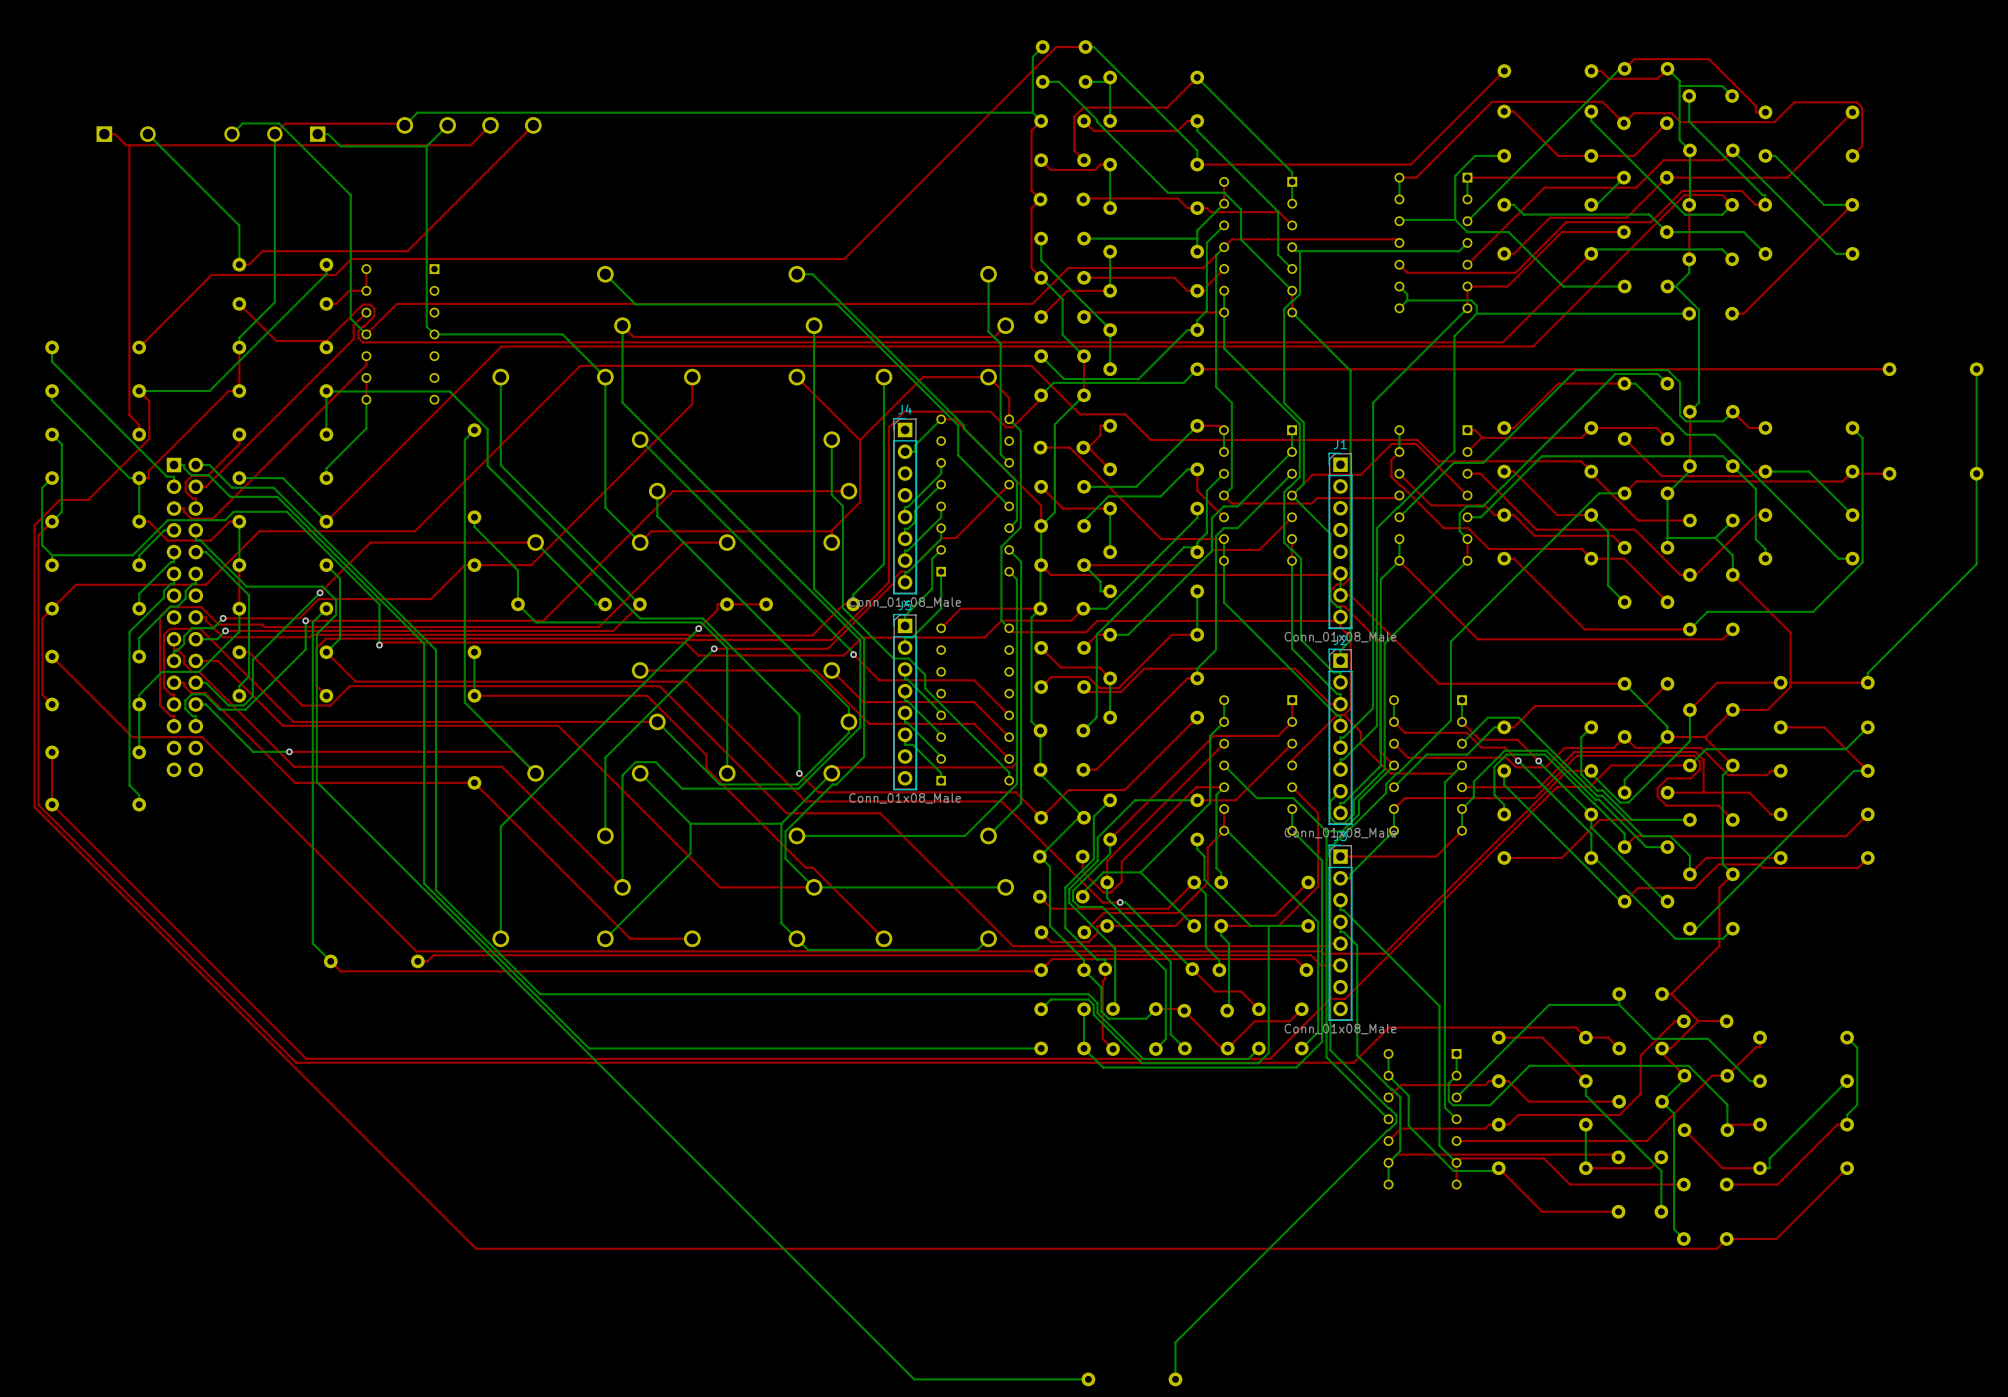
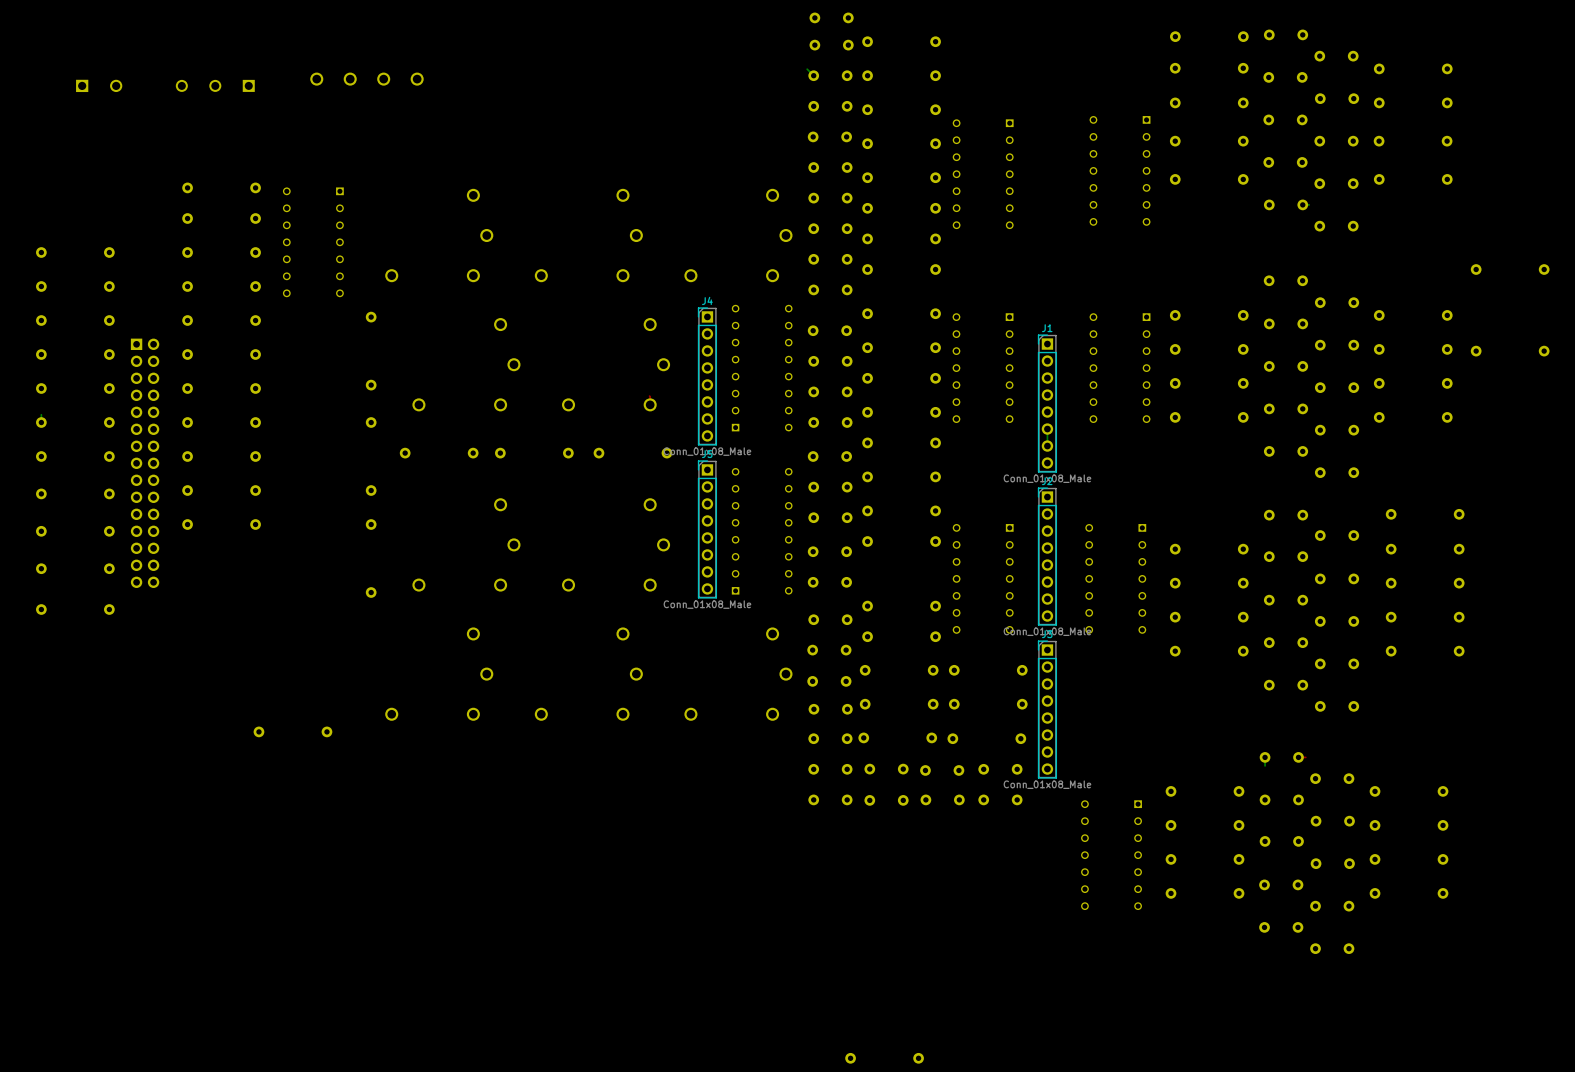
bottom track: (1042, 47) (1032, 56) (1032, 112) (417, 112) (404, 125) -> none
bottom track: (1085, 47) (1093, 47) (1197, 150) (1197, 164) -> none
top track: (1085, 47) (1056, 47) (844, 258) (351, 258) (335, 274) (211, 274) (139, 347) -> none
bottom track: (1624, 68) (1619, 68) (1467, 221) -> none
top track: (1624, 68) (1634, 59) (1708, 59) (1755, 106) (1755, 112) (1765, 112) -> none
bottom track: (1667, 68) (1679, 80) (1679, 140) (1689, 150) (1689, 204) -> none
top track: (1667, 68) (1657, 78) (1608, 78) (1601, 71) (1591, 71) -> none
top track: (1504, 71) (1410, 164) (1197, 164) -> none
bottom track: (1110, 77) (1110, 121) -> none
bottom track: (1197, 77) (1292, 172) (1292, 203) -> none
top track: (1197, 77) (1167, 107) (1083, 107) (1074, 116) (1074, 150) (1084, 160) -> none
bottom track: (1042, 81) (1059, 81) (1167, 192) (1224, 192) (1240, 209) (1240, 239) (1292, 290) -> none
bottom track: (1110, 81) (1085, 81) -> none
bottom track: (1679, 86) (1722, 86) (1732, 96) -> none
bottom track: (1689, 96) (1689, 121) (1762, 195) (1765, 195) (1765, 204) -> none
top track: (1504, 111) (1513, 111) (1558, 155) (1634, 155) (1666, 123) -> none
bottom track: (1591, 111) (1591, 121) (1684, 214) (1722, 214) (1732, 204) -> none
top track: (1852, 112) (1787, 177) (1666, 177) (1626, 217) (1549, 217) (1513, 253) (1504, 253) -> none
top track: (1041, 121) (1031, 130) (1031, 190) (1040, 199) (1031, 208) (1031, 268) (1041, 277) -> none
bottom track: (1197, 121) (1197, 130) (1278, 211) (1278, 254) (1292, 268) -> none
top track: (1197, 121) (1187, 121) (1177, 130) (1093, 130) (1084, 121) -> none
top track: (404, 125) (403, 123) (285, 123) (274, 134) -> none
bottom track: (447, 125) (426, 146) -> none
top track: (490, 125) (470, 145) (126, 145) (114, 134) (104, 134) -> none
top track: (533, 125) (407, 251) (262, 251) (248, 264) (239, 264) -> none
bottom track: (147, 134) (239, 225) (239, 264) -> none
bottom track: (232, 134) (242, 123) (279, 123) (350, 195) (350, 318) (366, 334) -> none
bottom track: (274, 134) (274, 302) (239, 337) (239, 347) -> none
bottom track: (317, 134) (328, 134) (340, 146) (426, 146) -> none
top track: (129, 145) (129, 415) (139, 424) (139, 434) -> none
bottom track: (426, 146) (426, 326) (434, 334) (562, 334) (605, 377) (605, 507) (640, 542) -> none
bottom track: (1732, 150) (1836, 253) (1852, 253) -> none
top track: (1732, 150) (1723, 160) (1663, 160) (1636, 187) (1544, 187) (1467, 264) -> none
bottom track: (1504, 155) (1475, 155) (1455, 175) (1455, 219) -> none
bottom track: (1765, 155) (1775, 155) (1824, 204) (1852, 204) -> none
top track: (1852, 155) (1862, 146) (1862, 107) (1856, 102) (1794, 102) (1774, 122) (1680, 122) (1671, 113) (1633, 113) (1623, 123) (1602, 101) (1492, 101) (1416, 177) (1399, 177) -> none
top track: (1041, 160) (1050, 169) (1095, 169) (1100, 164) (1110, 164) -> none
bottom track: (1110, 164) (1110, 208) -> none
bottom track: (1399, 177) (1399, 199) -> none
bottom track: (1467, 177) (1467, 199) -> none
bottom track: (1623, 177) (1596, 204) (1591, 204) -> none
top track: (1623, 177) (1467, 177) -> none
top track: (1224, 181) (1224, 203) -> none
top track: (1083, 199) (1177, 198) (1187, 208) (1206, 208) (1210, 212) (1278, 212) (1292, 225) -> none
bottom track: (1224, 203) (1197, 230) (1197, 251) -> none
bottom track: (1504, 204) (1513, 204) (1523, 214) (1649, 214) (1666, 232) (1743, 232) (1765, 253) -> none
top track: (1689, 204) (1689, 259) -> none
top track: (1732, 204) (1722, 195) (1684, 195) (1533, 346) (501, 346) (326, 521) -> none
top track: (1765, 204) (1755, 204) (1741, 190) (1682, 190) (1651, 222) (1566, 222) (1515, 272) (1407, 272) (1399, 264) -> none
top track: (1852, 204) (1743, 313) (1732, 313) -> none
bottom track: (1455, 219) (1467, 232) (1508, 232) (1563, 286) (1624, 286) -> none
bottom track: (1455, 219) (1399, 221) -> none
bottom track: (1224, 225) (1206, 242) (1206, 310) (1197, 320) (1197, 330) (1187, 330) (1138, 379) (1064, 379) (1041, 356) -> none
top track: (1623, 232) (1561, 232) (1507, 286) (1467, 286) (1467, 308) -> none
bottom track: (1041, 238) (1041, 260) (1110, 329) (1110, 369) -> none
bottom track: (1197, 238) (1084, 238) -> none
top track: (1399, 242) (1395, 239) (1232, 239) (1203, 267) (1068, 267) (1032, 303) (396, 303) (366, 334) -> none
bottom track: (1467, 242) (1459, 251) (1296, 251) (1292, 247) -> none
bottom track: (1224, 247) (1216, 255) (1216, 387) (1231, 402) (1231, 487) (1223, 495) -> none
bottom track: (1110, 251) (1110, 290) -> none
bottom track: (1300, 251) (1300, 294) (1284, 309) (1284, 402) (1303, 422) (1303, 483) (1292, 495) (1330, 533) (1330, 600) (1337, 607) (1340, 607) (1340, 617) -> none
bottom track: (1591, 253) (1595, 249) (1722, 249) (1732, 259) -> none
top track: (1591, 253) (1502, 342) (362, 342) (358, 338) (358, 330) (374, 316) (374, 308) (370, 304) (362, 304) (326, 341) -> none
bottom track: (1689, 259) (1689, 272) (1675, 286) (1699, 309) (1699, 402) (1689, 411) -> none
bottom track: (326, 264) (326, 274) (209, 391) (139, 391) -> none
top track: (1224, 268) (1206, 286) (1206, 290) (1187, 290) (1174, 277) (1084, 277) -> none
top track: (366, 269) (366, 290) (349, 290) (336, 303) (326, 303) -> none
bottom track: (605, 274) (635, 304) (837, 304) (958, 425) (958, 455) (1009, 506) -> none
bottom track: (796, 274) (812, 274) (964, 425) (964, 428) (1016, 481) (1016, 520) (1009, 528) -> none
bottom track: (988, 274) (988, 331) (1000, 343) (1000, 454) (1009, 462) -> none
bottom track: (1041, 277) (1062, 299) (1062, 334) (1084, 356) -> none
bottom track: (1399, 286) (1407, 294) (1407, 300) -> none
top track: (1110, 290) (1067, 290) (1041, 316) -> none
bottom track: (1224, 290) (1224, 348) (1299, 424) (1299, 477) (1284, 492) (1284, 542) (1301, 558) (1301, 639) (1333, 672) (1340, 672) (1340, 682) -> none
top track: (1292, 290) (1292, 312) -> none
bottom track: (1407, 300) (1471, 300) (1476, 305) (1476, 313) -> none
bottom track: (1407, 300) (1399, 308) -> none
top track: (239, 303) (276, 341) (326, 341) -> none
bottom track: (1467, 308) (1373, 402) (1373, 708) (1343, 737) (1340, 737) (1340, 747) -> none
top track: (366, 312) (353, 325) (353, 338) (205, 486) (195, 486) -> none
top track: (1224, 312) (1088, 312) (1084, 316) -> none
bottom track: (1292, 312) (1350, 370) (1350, 640) (1340, 650) (1340, 660) -> none
bottom track: (1476, 313) (1454, 336) (1454, 451) (1376, 528) (1376, 726) (1343, 759) (1340, 759) (1340, 769) -> none
bottom track: (1689, 313) (1476, 313) -> none
bottom track: (622, 325) (622, 402) (860, 640) (860, 727) (798, 788) (682, 788) (655, 762) (635, 762) (622, 775) (622, 887) -> none
bottom track: (814, 325) (814, 588) (864, 638) (864, 756) (836, 784) (832, 784) (785, 831) (785, 858) (814, 887) (1005, 887) -> none
top track: (1005, 325) (994, 336) (633, 336) (622, 325) -> none
bottom track: (52, 347) (52, 361) (167, 476) (174, 476) (174, 486) -> none
top track: (239, 347) (239, 391) (228, 391) (148, 470) (148, 478) (139, 478) -> none
top track: (366, 356) (366, 365) (212, 518) (191, 518) (184, 511) (184, 508) (174, 508) -> none
top track: (1084, 356) (1084, 395) -> none
bottom track: (1197, 369) (1183, 382) (1053, 382) (1041, 395) -> none
top track: (1889, 369) (1197, 369) -> none
bottom track: (1976, 369) (1976, 564) (1867, 673) (1867, 682) -> none
top track: (366, 377) (366, 399) -> none
bottom track: (500, 377) (500, 465) (639, 604) -> none
top track: (692, 377) (692, 403) (531, 565) (464, 565) (430, 599) (318, 599) (299, 618) (223, 618) -> none
top track: (796, 377) (860, 440) -> none
bottom track: (883, 377) (883, 564) (853, 594) (853, 604) -> none
bottom track: (1624, 383) (1635, 383) (1686, 434) (1715, 434) (1838, 558) (1852, 558) -> none
top track: (1624, 383) (1558, 383) (1513, 428) (1504, 428) -> none
bottom track: (1667, 383) (1657, 373) (1615, 373) (1483, 506) (1466, 506) (1459, 513) (1459, 531) (1467, 539) -> none
bottom track: (52, 391) (52, 400) (129, 478) (139, 478) (139, 521) -> none
top track: (139, 391) (149, 401) (149, 438) (88, 499) (59, 499) (34, 525) (34, 807) (476, 1248) (1716, 1248) (1726, 1238) (1776, 1238) (1847, 1168) -> none
bottom track: (326, 391) (326, 434) -> none
bottom track: (326, 391) (449, 391) (487, 429) (487, 466) (640, 618) (702, 618) (799, 715) (799, 773) -> none
top track: (1041, 395) (1041, 398) (1012, 427) (1006, 427) (990, 411) (904, 411) (888, 427) (888, 582) (831, 640) (325, 638) (316, 648) (316, 685) (326, 695) -> none
bottom track: (1084, 395) (1054, 424) (1054, 512) (1041, 525) (1040, 608) (1031, 617) (1031, 721) (1040, 730) (1040, 774) (1084, 817) -> none
bottom track: (366, 399) (366, 428) (326, 468) (326, 478) -> none
top track: (1689, 411) (1689, 466) -> none
bottom track: (1732, 411) (1723, 421) (1685, 421) (1680, 415) (1680, 382) (1667, 370) (1576, 370) (1483, 462) (1453, 462) (1399, 517) -> none
top track: (1732, 411) (1749, 428) (1765, 428) -> none
bottom track: (941, 419) (915, 445) (915, 451) (905, 451) -> none
top track: (941, 419) (954, 419) (1041, 505) (1041, 525) -> none
bottom track: (1009, 419) (1020, 430) (1020, 527) (1001, 546) (1001, 620) (1009, 628) -> none
top track: (1009, 419) (1009, 397) (988, 377) (923, 377) (860, 440) -> none
top track: (1110, 425) (1100, 425) (1100, 435) (1088, 447) -> none
bottom track: (1197, 425) (1136, 486) (1084, 486) -> none
top track: (1197, 425) (1219, 425) (1223, 430) -> none
bottom track: (1852, 428) (1862, 438) (1862, 562) (1813, 611) (1707, 611) (1689, 629) -> none
bottom track: (474, 430) (464, 439) (464, 702) (535, 773) -> none
bottom track: (1223, 430) (1223, 451) -> none
bottom track: (1292, 430) (1292, 451) (1237, 506) (1223, 506) (1211, 518) (1211, 551) (1128, 634) (1110, 634) -> none
bottom track: (1399, 430) (1399, 451) -> none
top track: (1467, 430) (1475, 430) (1482, 437) (1581, 437) (1591, 428) (1656, 428) (1667, 438) -> none
bottom track: (52, 434) (61, 444) (61, 511) (52, 521) -> none
top track: (239, 434) (239, 444) (207, 475) (192, 475) (185, 482) (185, 491) (192, 498) (195, 498) (195, 508) -> none
top track: (1482, 437) (1467, 451) -> none
top track: (1624, 438) (1661, 476) (1751, 476) (1755, 471) (1765, 471) -> none
bottom track: (640, 439) (853, 654) -> none
bottom track: (831, 439) (831, 494) (842, 506) (842, 607) (893, 658) (908, 658) (925, 674) (925, 688) (1009, 772) (1009, 780) -> none
top track: (860, 440) (860, 502) (830, 531) (651, 531) (640, 542) -> none
top track: (1040, 447) (1069, 447) (1161, 539) (1223, 539) -> none
top track: (1088, 447) (1110, 469) -> none
top track: (1399, 451) (1391, 460) (1391, 476) (1443, 528) (1468, 528) (1489, 548) (1581, 548) (1591, 558) (1623, 558) (1667, 602) -> none
bottom track: (941, 462) (941, 473) (907, 506) (905, 506) (905, 517) -> none
bottom track: (174, 465) (184, 465) (184, 468) (191, 475) (208, 475) (230, 496) (277, 496) (424, 643) (424, 883) (589, 1048) (1041, 1048) -> none
bottom track: (195, 465) (209, 465) (232, 487) (273, 487) (435, 650) (435, 889) (540, 994) (1088, 994) (1097, 1003) (1097, 1013) (1143, 1059) (1248, 1059) (1258, 1048) -> none
bottom track: (1689, 466) (1689, 470) (1667, 493) (1667, 547) -> none
bottom track: (1197, 469) (1187, 469) (1160, 496) (1108, 496) (1084, 520) (1084, 525) -> none
top track: (1197, 469) (1197, 490) (1223, 517) -> none
top track: (1504, 471) (1513, 471) (1557, 515) (1591, 515) -> none
bottom track: (1765, 471) (1809, 471) (1852, 515) -> none
bottom track: (1223, 473) (1206, 490) (1206, 532) (1197, 542) (1197, 552) -> none
bottom track: (1292, 473) (1237, 528) (1223, 528) (1215, 536) (1215, 649) (1197, 668) (1197, 678) -> none
top track: (1399, 473) (1431, 505) (1484, 505) (1494, 515) (1513, 515) (1534, 535) (1612, 535) (1624, 547) -> none
top track: (1467, 473) (1480, 473) (1536, 529) (1635, 529) (1680, 574) (1695, 574) (1755, 515) (1765, 515) -> none
top track: (1889, 473) (1854, 473) (1852, 471) (1842, 481) (1636, 481) (1624, 493) -> none
bottom track: (52, 478) (42, 488) (42, 545) (52, 555) (132, 555) (167, 520) (225, 520) (233, 511) (286, 511) (379, 604) (379, 645) -> none
bottom track: (239, 478) (282, 478) (326, 521) -> none
bottom track: (941, 484) (915, 510) (915, 521) (908, 528) (905, 528) (905, 538) -> none
top track: (1009, 484) (955, 538) (941, 538) (908, 571) (901, 571) (894, 578) (894, 582) (828, 648) (714, 648) -> none
top track: (1041, 486) (1062, 508) (1110, 508) -> none
bottom track: (657, 491) (657, 516) (848, 707) (848, 732) (797, 784) (719, 784) (657, 721) -> none
top track: (848, 491) (673, 491) (543, 620) (305, 620) -> none
bottom track: (1624, 493) (1599, 493) (1450, 641) (1450, 720) (1386, 784) (1386, 792) (1330, 847) (1330, 1050) (1396, 1115) (1396, 1122) (1175, 1342) (1175, 1379) -> none
top track: (1399, 495) (1396, 498) (1317, 498) (1311, 503) (1232, 503) (1223, 495) -> none
top track: (1467, 495) (1415, 443) (1391, 443) (1360, 474) (1312, 474) (1292, 495) -> none
top track: (1350, 498) (1350, 577) (1343, 584) (1337, 584) (1330, 591) (1330, 599) (1337, 606) (1344, 606) (1379, 641) (1379, 751) (1393, 765) -> none
bottom track: (941, 506) (941, 517) (908, 550) (905, 550) (905, 560) -> none
bottom track: (1110, 508) (1110, 552) -> none
bottom track: (1197, 508) (1197, 517) (1106, 608) (1083, 608) -> none
bottom track: (1591, 515) (1608, 531) (1608, 585) (1624, 602) -> none
bottom track: (474, 517) (474, 526) (518, 570) (518, 604) (536, 622) (701, 622) (727, 648) (727, 773) -> none
top track: (1292, 517) (1259, 549) (1213, 549) (1197, 565) (1084, 565) -> none
bottom track: (1467, 517) (1480, 517) (1541, 456) (1722, 456) (1755, 489) (1755, 539) (1765, 548) (1765, 558) -> none
top track: (1689, 520) (1638, 520) (1581, 461) (1438, 461) (1417, 440) (1150, 440) (1125, 414) (1079, 414) (1031, 365) (580, 365) (414, 531) (259, 531) (205, 584) (76, 584) (42, 618) (42, 694) (52, 704) -> none
bottom track: (1732, 520) (1715, 538) -> none
top track: (52, 521) (38, 535) (38, 805) (296, 1062) (1353, 1062) (1389, 1027) (1575, 1027) (1585, 1037) (1608, 1037) (1619, 1048) -> none
bottom track: (239, 521) (239, 565) -> none
top track: (239, 521) (229, 521) (210, 540) (167, 540) (148, 521) (139, 521) -> none
bottom track: (941, 528) (941, 538) (907, 572) (905, 572) (905, 582) -> none
bottom track: (174, 530) (163, 530) (139, 555) (139, 565) -> none
bottom track: (195, 530) (195, 540) (200, 540) (246, 586) (322, 586) (336, 600) (336, 614) (316, 634) (316, 781) (914, 1379) (1088, 1379) -> none
bottom track: (1715, 538) (1667, 538) -> none
bottom track: (1715, 538) (1732, 555) (1732, 574) -> none
bottom track: (1223, 539) (1223, 602) (1337, 715) (1340, 715) (1340, 725) -> none
top track: (1292, 539) (1292, 560) -> none
bottom track: (1399, 539) (1399, 560) (1380, 579) (1380, 765) (1343, 802) (1340, 802) (1340, 813) -> none
top track: (1467, 539) (1467, 560) -> none
bottom track: (535, 542) (595, 604) (605, 604) -> none
top track: (535, 542) (370, 542) (320, 592) -> none
top track: (727, 542) (683, 542) (598, 627) (264, 627) (262, 624) (218, 624) (201, 607) (169, 607) (160, 616) (160, 705) (170, 716) (174, 716) (174, 726) -> none
bottom track: (1197, 547) (1184, 547) (1096, 634) (1096, 717) (1083, 730) -> none
bottom track: (941, 549) (932, 558) (932, 588) (905, 615) (905, 625) -> none
bottom track: (1009, 549) (1021, 561) (1021, 803) (988, 835) -> none
bottom track: (174, 552) (174, 562) (170, 562) (139, 593) (139, 608) -> none
bottom track: (195, 552) (205, 552) (248, 595) (248, 676) (239, 686) (239, 695) -> none
top track: (1504, 558) (1513, 558) (1584, 629) (1689, 629) -> none
bottom track: (1292, 560) (1292, 648) (1337, 694) (1340, 694) (1340, 704) -> none
top track: (1399, 560) (1477, 639) (1722, 639) (1732, 629) -> none
bottom track: (1467, 560) (1384, 643) (1384, 769) (1353, 800) (1353, 814) (1344, 823) (1335, 823) (1330, 817) (1330, 801) (1340, 791) -> none
top track: (239, 565) (239, 608) -> none
bottom track: (326, 565) (340, 578) (340, 638) (326, 652) -> none
top track: (1041, 565) (1050, 574) (1340, 573) -> none
bottom track: (1084, 565) (1100, 581) (1100, 591) (1110, 591) -> none
bottom track: (941, 571) (941, 608) (912, 637) (905, 637) (905, 647) -> none
bottom track: (1009, 571) (1016, 579) (1016, 783) (964, 835) (796, 835) -> none
bottom track: (174, 573) (174, 583) (170, 583) (163, 590) (163, 597) (129, 632) (129, 785) (139, 795) (139, 804) -> none
bottom track: (195, 573) (195, 583) (192, 583) (185, 590) (185, 598) (177, 606) (170, 606) (139, 637) (139, 656) -> none
top track: (1732, 574) (1790, 632) (1790, 686) (1767, 709) (1732, 709) (1705, 736) -> none
bottom track: (1197, 591) (1197, 634) -> none
bottom track: (320, 592) (252, 660) (252, 696) (243, 705) (228, 705) (205, 682) (195, 682) -> none
via: (320, 592) -> none
top track: (1340, 595) (1350, 595) (1439, 683) (1624, 683) -> none
top track: (639, 604) (613, 630) (225, 630) -> none
top track: (766, 604) (717, 604) (717, 610) (698, 628) -> none
top track: (853, 604) (843, 604) (812, 635) (312, 634) (309, 637) (222, 637) (205, 620) (205, 617) (195, 617) -> none
bottom track: (239, 608) (239, 631) (199, 671) (162, 671) (139, 694) (139, 752) -> none
bottom track: (326, 608) (312, 622) (312, 943) (330, 961) -> none
top track: (1040, 608) (960, 608) (941, 628) -> none
top track: (1083, 608) (1071, 620) (1001, 620) (984, 637) (861, 637) (843, 655) (698, 655) (685, 642) (382, 642) (379, 645) -> none
top track: (1340, 617) (1340, 627) (1350, 637) (1350, 708) (1343, 715) -> none
bottom track: (223, 618) (213, 628) (192, 628) (184, 636) (184, 643) (177, 650) (174, 650) (174, 660) -> none
via: (223, 618) -> none
bottom track: (305, 620) (305, 649) (245, 709) (219, 709) (204, 694) (191, 694) (185, 700) (185, 708) (192, 716) (195, 716) (195, 726) -> none
via: (305, 620) -> none
top track: (1340, 620) (1097, 620) (1085, 632) (1013, 632) (1009, 628) -> none
bottom track: (698, 628) (500, 826) (500, 938) -> none
via: (698, 628) -> none
bottom track: (225, 630) (217, 639) (195, 639) -> none
via: (225, 630) -> none
top track: (1017, 632) (1017, 762) (1012, 767) (837, 767) (831, 773) -> none
top track: (1110, 634) (1097, 634) (1084, 647) -> none
top track: (1197, 634) (1171, 634) (1118, 688) (1099, 688) (1088, 677) (1051, 677) (1041, 687) -> none
top track: (174, 639) (174, 649) (177, 649) (184, 656) (184, 663) (192, 671) (199, 671) (294, 766) (501, 766) (622, 887) -> none
via: (379, 645) -> none
top track: (1041, 647) (1060, 667) (1099, 667) (1110, 678) -> none
bottom track: (714, 648) (605, 757) (605, 835) -> none
via: (714, 648) -> none
top track: (239, 652) (248, 652) (302, 705) (330, 705) (349, 686) (659, 686) (786, 813) (880, 813) (1012, 946) (1327, 946) (1330, 943) (1340, 943) -> none
top track: (326, 652) (355, 681) (685, 681) (805, 801) (1001, 801) (1102, 902) (1120, 902) -> none
bottom track: (474, 652) (474, 695) -> none
top track: (853, 654) (879, 680) (974, 680) (1009, 715) -> none
via: (853, 654) -> none
top track: (52, 656) (132, 737) (202, 737) (416, 951) (1321, 951) (1323, 953) (1384, 953) (1567, 770) (1591, 770) -> none
top track: (195, 660) (218, 660) (282, 725) (558, 725) (719, 887) (814, 887) -> none
bottom track: (905, 669) (905, 679) (907, 679) (941, 712) (941, 715) -> none
top track: (640, 670) (815, 670) (869, 723) (974, 723) (1009, 758) -> none
top track: (831, 670) (863, 702) (974, 702) (1009, 737) -> none
bottom track: (1110, 678) (1110, 717) -> none
top track: (1197, 678) (1187, 678) (1096, 769) (1083, 769) -> none
top track: (174, 682) (184, 682) (184, 685) (191, 692) (205, 692) (295, 782) (474, 782) (630, 938) (692, 938) -> none
top track: (1780, 682) (1717, 682) (1689, 709) -> none
top track: (1867, 682) (1790, 682) -> none
bottom track: (1624, 683) (1667, 726) (1667, 736) (1624, 779) (1624, 792) -> none
top track: (1667, 683) (1645, 706) (1535, 706) (1513, 727) (1504, 727) -> none
top track: (1084, 687) (1088, 692) (1120, 692) (1144, 668) (1294, 668) (1330, 704) (1340, 704) -> none
bottom track: (905, 691) (905, 701) (907, 701) (941, 734) (941, 737) -> none
top track: (474, 695) (647, 695) (706, 754) (706, 768) (805, 867) (812, 867) (883, 938) -> none
bottom track: (1224, 700) (1224, 721) (1210, 735) (1210, 802) (1140, 872) -> none
top track: (1292, 700) (1292, 721) (1278, 735) (1213, 735) (1110, 839) -> none
bottom track: (1393, 700) (1393, 721) -> none
bottom track: (1462, 700) (1462, 721) -> none
top track: (174, 704) (174, 694) (170, 694) (163, 687) (163, 634) (170, 628) (200, 628) (293, 721) (657, 721) -> none
bottom track: (195, 704) (205, 704) (253, 751) (289, 751) -> none
bottom track: (1689, 709) (1689, 741) (1628, 802) (1620, 802) (1591, 773) (1591, 770) -> none
bottom track: (905, 712) (905, 723) (907, 723) (941, 756) (941, 758) -> none
top track: (1343, 715) (1337, 715) (1292, 759) (1292, 765) -> none
top track: (1343, 715) (1360, 732) (1360, 744) (1390, 773) (1453, 773) (1462, 765) -> none
top track: (1197, 717) (1124, 790) (1068, 790) (1041, 817) (1015, 792) (818, 792) (799, 773) -> none
top track: (1393, 721) (1404, 732) (1466, 732) (1481, 747) (1505, 747) (1518, 760) -> none
top track: (1462, 721) (1479, 739) (1517, 739) (1538, 761) -> none
bottom track: (1504, 727) (1494, 727) (1467, 754) (1426, 754) (1393, 787) -> none
bottom track: (1591, 727) (1581, 737) (1581, 774) (1597, 790) (1602, 790) (1632, 819) (1689, 819) -> none
top track: (1780, 727) (1824, 727) (1867, 770) -> none
bottom track: (1867, 727) (1846, 749) (1706, 749) (1689, 765) -> none
bottom track: (905, 734) (905, 744) (912, 744) (941, 773) (941, 780) -> none
top track: (1705, 736) (1667, 736) -> none
top track: (1705, 736) (1732, 765) -> none
top track: (1224, 743) (1107, 860) (1107, 882) -> none
top track: (1292, 743) (1235, 800) (1197, 800) -> none
top track: (1393, 743) (1408, 757) (1506, 757) (1516, 767) (1545, 767) (1564, 748) (1613, 748) (1624, 736) (1635, 747) (1701, 747) (1728, 775) (1766, 775) (1771, 770) (1780, 770) -> none
bottom track: (1462, 743) (1488, 717) (1518, 717) (1596, 795) (1602, 795) (1642, 836) (1670, 836) (1689, 855) (1689, 874) -> none
top track: (289, 751) (514, 751) (535, 773) -> none
via: (289, 751) -> none
top track: (52, 752) (52, 804) (306, 1058) (1270, 1058) (1330, 998) (1345, 998) (1557, 786) (1589, 786) (1611, 765) (1689, 765) -> none
bottom track: (1518, 760) (1591, 833) (1591, 857) (1594, 857) (1675, 938) (1722, 938) (1732, 928) -> none
via: (1518, 760) -> none
bottom track: (1538, 761) (1591, 814) (1591, 827) (1667, 901) -> none
via: (1538, 761) -> none
bottom track: (1224, 765) (1256, 798) (1293, 798) (1326, 831) -> none
bottom track: (1393, 765) (1358, 800) (1358, 814) (1341, 831) (1326, 831) -> none
bottom track: (1462, 765) (1444, 782) (1444, 1107) (1456, 1119) -> none
bottom track: (1732, 765) (1722, 775) (1722, 864) (1732, 874) -> none
bottom track: (1504, 770) (1504, 784) (1620, 901) (1624, 901) -> none
bottom track: (1867, 770) (1854, 770) (1696, 928) (1689, 928) -> none
bottom track: (640, 773) (690, 823) -> none
via: (799, 773) -> none
bottom track: (831, 773) (781, 823) -> none
bottom track: (1224, 787) (1216, 794) (1216, 868) (1221, 872) (1221, 882) -> none
top track: (1224, 787) (1196, 787) (1121, 861) (1121, 881) (1110, 892) (1103, 892) (1082, 871) (1082, 856) -> none
top track: (1292, 787) (1318, 813) (1318, 886) (1278, 925) (1221, 925) -> none
top track: (1462, 787) (1539, 787) (1574, 751) (1695, 751) (1703, 759) (1703, 792) -> none
top track: (1667, 792) (1749, 792) (1771, 814) (1780, 814) -> none
bottom track: (1110, 800) (1093, 816) (1093, 859) (1065, 887) (1065, 927) (1096, 959) (1105, 959) (1105, 969) -> none
bottom track: (1197, 800) (1135, 800) (1097, 837) (1097, 860) (1069, 889) (1069, 902) (1115, 948) (1115, 1006) (1113, 1009) -> none
top track: (1224, 809) (1224, 830) (1207, 847) (1207, 882) (1177, 913) (1103, 913) (1084, 932) -> none
bottom track: (1292, 809) (1292, 830) (1322, 860) (1322, 1041) (1296, 1067) (1103, 1067) (1084, 1048) (1084, 1009) -> none
bottom track: (1393, 809) (1393, 830) (1350, 874) (1350, 878) (1340, 878) -> none
top track: (1393, 809) (1404, 798) (1534, 798) (1576, 755) (1694, 755) (1699, 761) (1699, 769) (1690, 778) (1667, 778) (1657, 788) (1657, 796) (1666, 805) (1718, 805) (1732, 819) -> none
bottom track: (1504, 814) (1504, 804) (1494, 794) (1494, 766) (1506, 754) (1544, 754) (1624, 833) (1624, 847) -> none
top track: (1867, 814) (1846, 836) (1635, 836) (1624, 847) -> none
bottom track: (1081, 815) (1039, 856) (1050, 866) (1050, 926) (1084, 960) (1084, 970) (1101, 987) (1101, 1011) (1108, 1018) (1146, 1018) (1155, 1009) -> none
top track: (1689, 819) (1599, 819) (1561, 857) (1504, 857) -> none
bottom track: (690, 823) (690, 853) (605, 938) -> none
bottom track: (781, 823) (690, 823) -> none
bottom track: (781, 823) (781, 923) (808, 949) (977, 949) (988, 938) -> none
bottom track: (1224, 830) (1227, 830) (1318, 921) (1318, 1032) (1301, 1048) -> none
bottom track: (1462, 830) (1462, 809) (1473, 797) (1473, 781) (1504, 750) (1546, 750) (1646, 847) (1667, 847) -> none
top track: (1462, 830) (1436, 856) (1340, 856) -> none
bottom track: (1326, 831) (1326, 1057) (1388, 1119) -> none
bottom track: (1110, 839) (1110, 853) (1073, 890) (1073, 900) (1079, 906) (1102, 906) (1165, 970) (1165, 1039) (1155, 1049) -> none
bottom track: (1197, 839) (1197, 849) (1204, 856) (1204, 879) (1250, 925) (1308, 925) -> none
top track: (1780, 857) (1706, 857) (1689, 874) -> none
top track: (1867, 857) (1857, 867) (1763, 867) (1759, 864) (1718, 864) (1694, 888) (1638, 888) (1624, 901) -> none
bottom track: (1140, 872) (1103, 872) (1082, 893) (1082, 896) -> none
bottom track: (1140, 872) (1194, 925) -> none
top track: (1732, 874) (1719, 887) (1719, 946) (1671, 994) (1698, 1020) -> none
bottom track: (1107, 882) (1107, 898) (1170, 961) (1170, 1034) (1184, 1048) -> none
bottom track: (1194, 882) (1205, 894) (1205, 946) (1219, 960) (1219, 970) -> none
top track: (1194, 882) (1168, 908) (1051, 908) (1039, 896) -> none
top track: (1308, 882) (1275, 915) (1185, 915) (1175, 925) (1097, 925) (1097, 933) (1088, 942) (1051, 942) (1041, 932) -> none
bottom track: (1340, 900) (1340, 910) (1343, 910) (1439, 1005) (1439, 1145) (1456, 1162) -> none
bottom track: (1120, 902) (1125, 902) (1192, 969) -> none
via: (1120, 902) -> none
bottom track: (1340, 921) (1340, 931) (1343, 931) (1357, 945) (1357, 1055) (1400, 1097) (1400, 1151) (1388, 1162) (1388, 1184) -> none
bottom track: (1221, 925) (1221, 935) (1229, 943) (1229, 1008) (1227, 1010) -> none
bottom track: (1268, 925) (1268, 1052) (1258, 1063) (1142, 1063) (1093, 1014) (1093, 1004) (1088, 999) (1050, 999) (1041, 1009) -> none
top track: (330, 961) (340, 971) (1039, 971) (1052, 959) (1295, 959) (1306, 970) -> none
top track: (417, 961) (427, 961) (433, 955) (1310, 955) (1321, 965) (1340, 965) -> none
top track: (1105, 969) (1105, 978) (1102, 981) (1102, 1038) (1113, 1049) -> none
top track: (1192, 969) (1214, 991) (1241, 991) (1258, 1009) -> none
top track: (1155, 1009) (1182, 1009) (1222, 1048) (1227, 1048) (1254, 1021) (1289, 1021) (1301, 1009) -> none
top track: (1698, 1020) (1670, 1048) (1662, 1048) (1662, 1053) (1684, 1075) -> none
top track: (1698, 1020) (1726, 1021) -> none
top track: (1683, 1021) (1675, 1021) (1640, 1055) (1640, 1093) (1619, 1115) (1518, 1115) (1508, 1124) (1489, 1124) (1485, 1128) (1400, 1128) (1388, 1141) -> none
top track: (1498, 1037) (1542, 1037) (1585, 1081) -> none
top track: (1760, 1037) (1760, 1047) (1755, 1047) (1727, 1075) (1712, 1075) (1646, 1141) (1456, 1141) -> none
bottom track: (1847, 1037) (1857, 1047) (1857, 1104) (1847, 1115) (1847, 1124) -> none
bottom track: (1388, 1053) (1388, 1075) (1408, 1095) (1408, 1125) (1453, 1170) (1496, 1170) (1498, 1168) -> none
bottom track: (1456, 1053) (1456, 1075) (1448, 1083) (1448, 1101) (1452, 1105) (1490, 1105) (1529, 1065) (1688, 1065) (1727, 1104) (1727, 1130) -> none
bottom track: (1684, 1075) (1684, 1079) (1662, 1101) (1674, 1113) (1674, 1229) (1683, 1238) -> none
bottom track: (1585, 1081) (1585, 1095) (1661, 1170) (1661, 1211) -> none
bottom track: (1760, 1081) (1750, 1081) (1708, 1038) (1653, 1038) (1619, 1004) (1549, 1004) (1456, 1097) -> none
bottom track: (1847, 1081) (1769, 1158) (1769, 1168) (1760, 1168) -> none
top track: (1388, 1097) (1400, 1085) (1485, 1085) (1489, 1081) (1508, 1081) (1528, 1101) (1619, 1101) -> none
bottom track: (1585, 1124) (1585, 1168) -> none
top track: (1760, 1124) (1732, 1124) (1727, 1130) -> none
top track: (1847, 1124) (1837, 1124) (1777, 1184) (1726, 1184) -> none
top track: (1684, 1130) (1722, 1168) (1760, 1168) -> none
top track: (1618, 1157) (1615, 1154) (1396, 1154) (1388, 1162) -> none
top track: (1661, 1157) (1650, 1168) (1585, 1168) -> none
top track: (1498, 1168) (1542, 1211) (1618, 1211) -> none
top track: (1683, 1184) (1570, 1184) (1543, 1158) (1460, 1158) (1456, 1162) (1456, 1184) -> none

